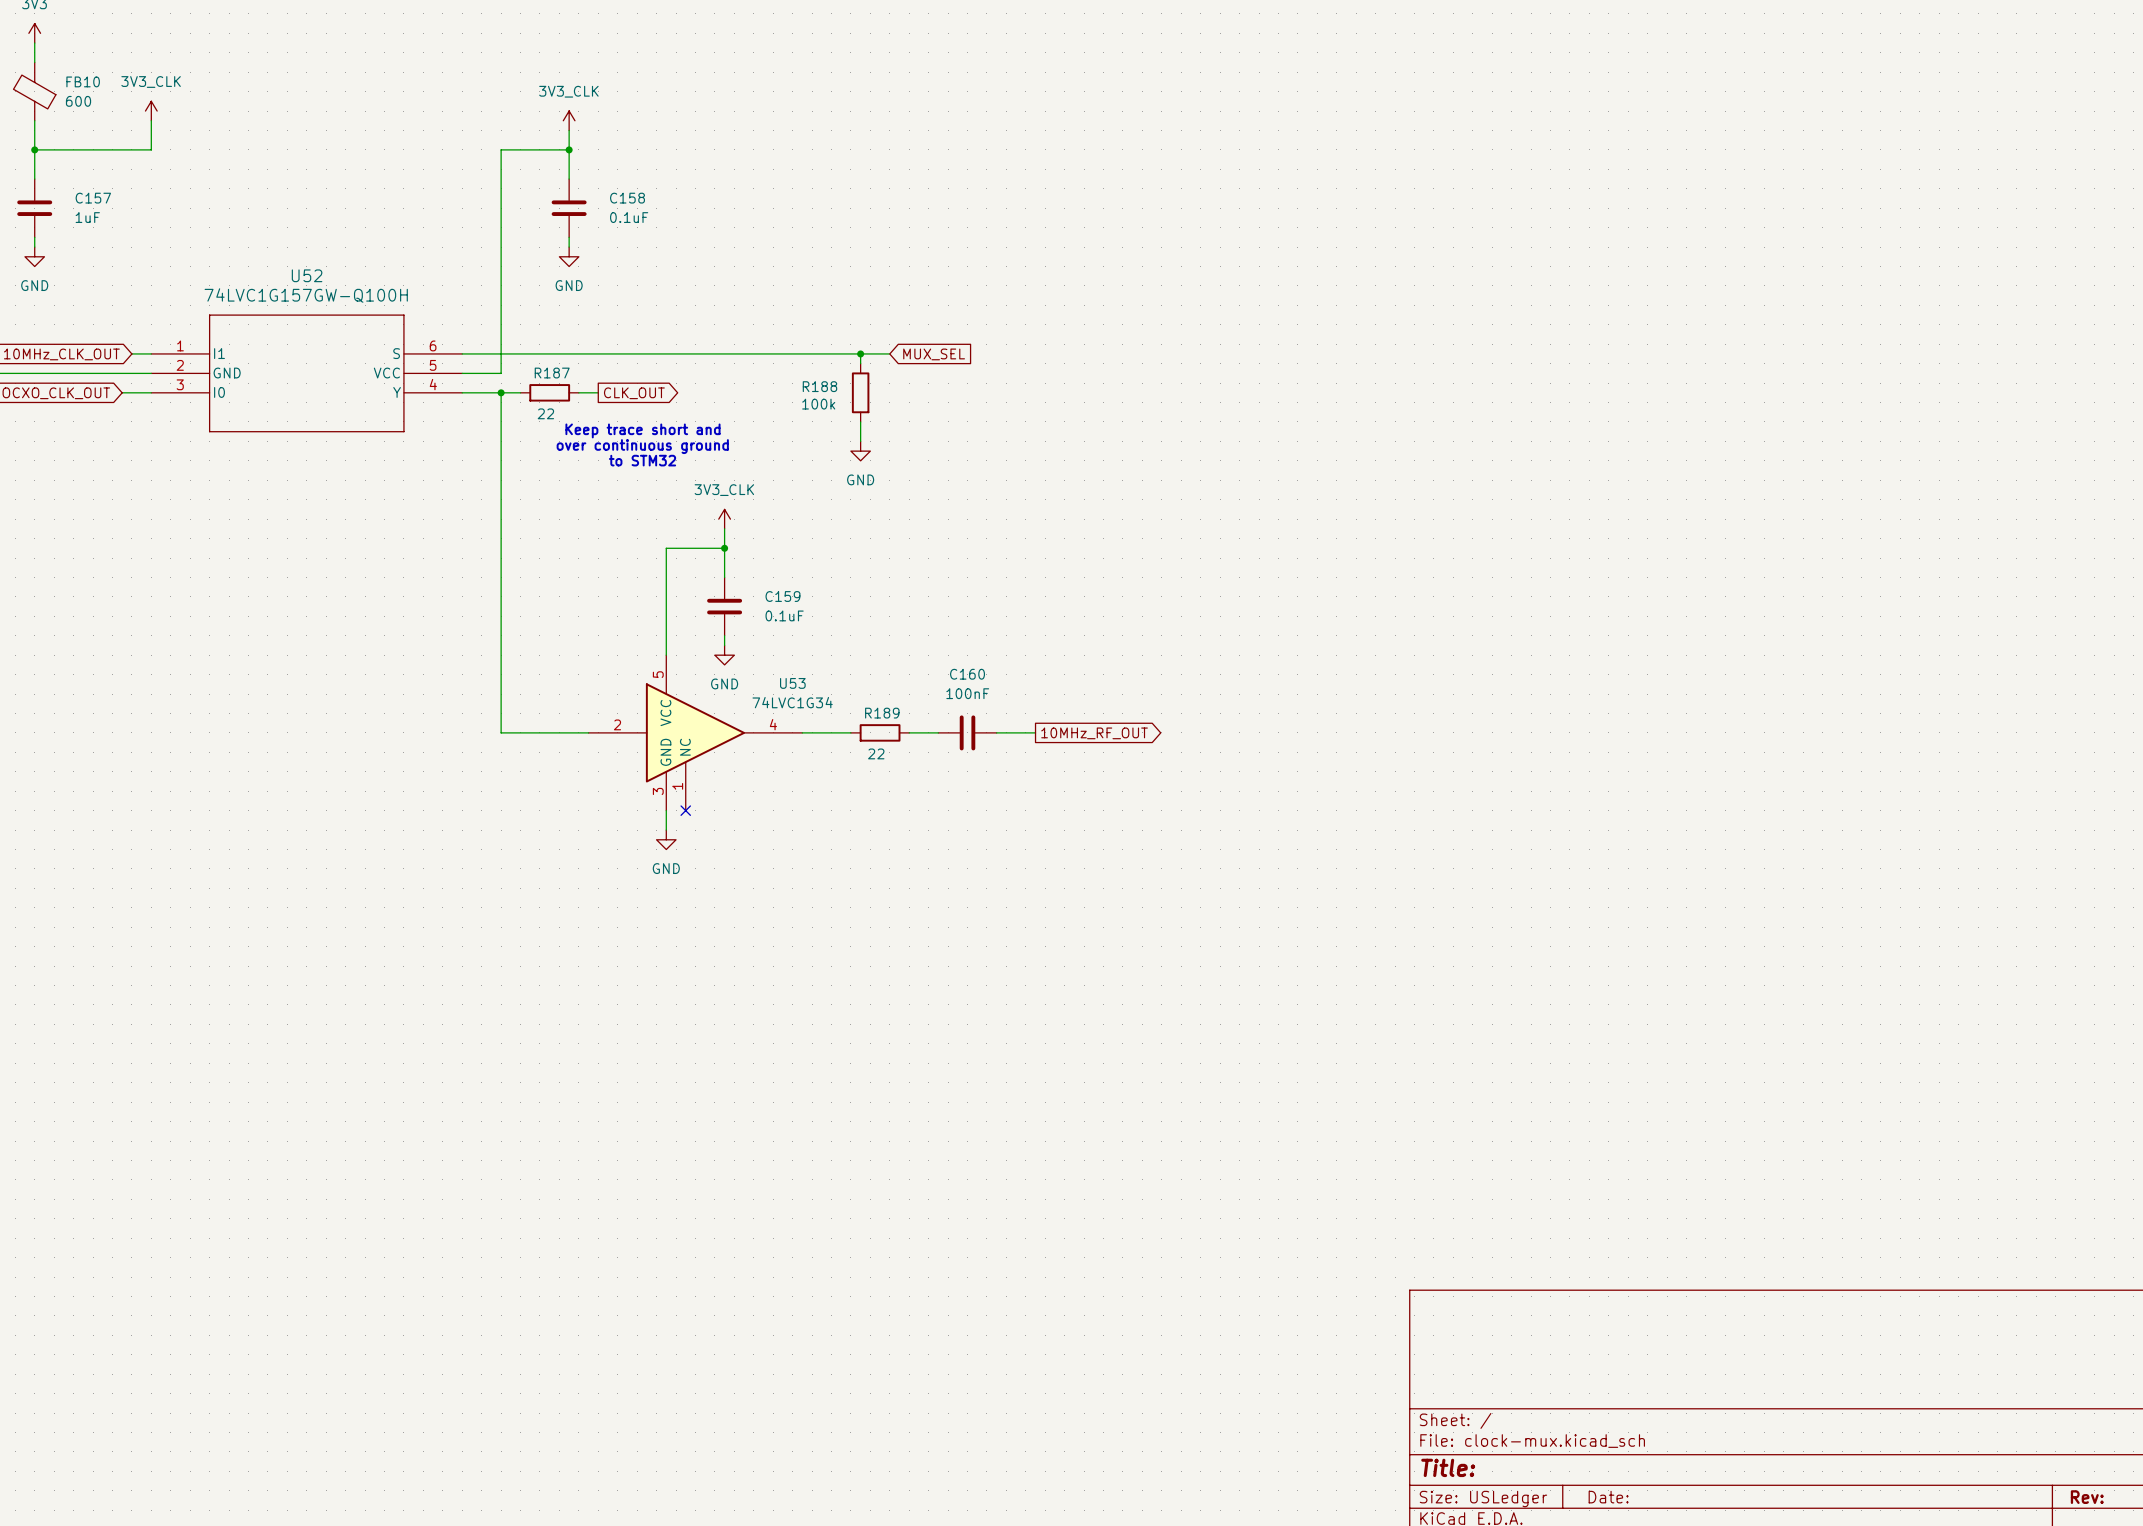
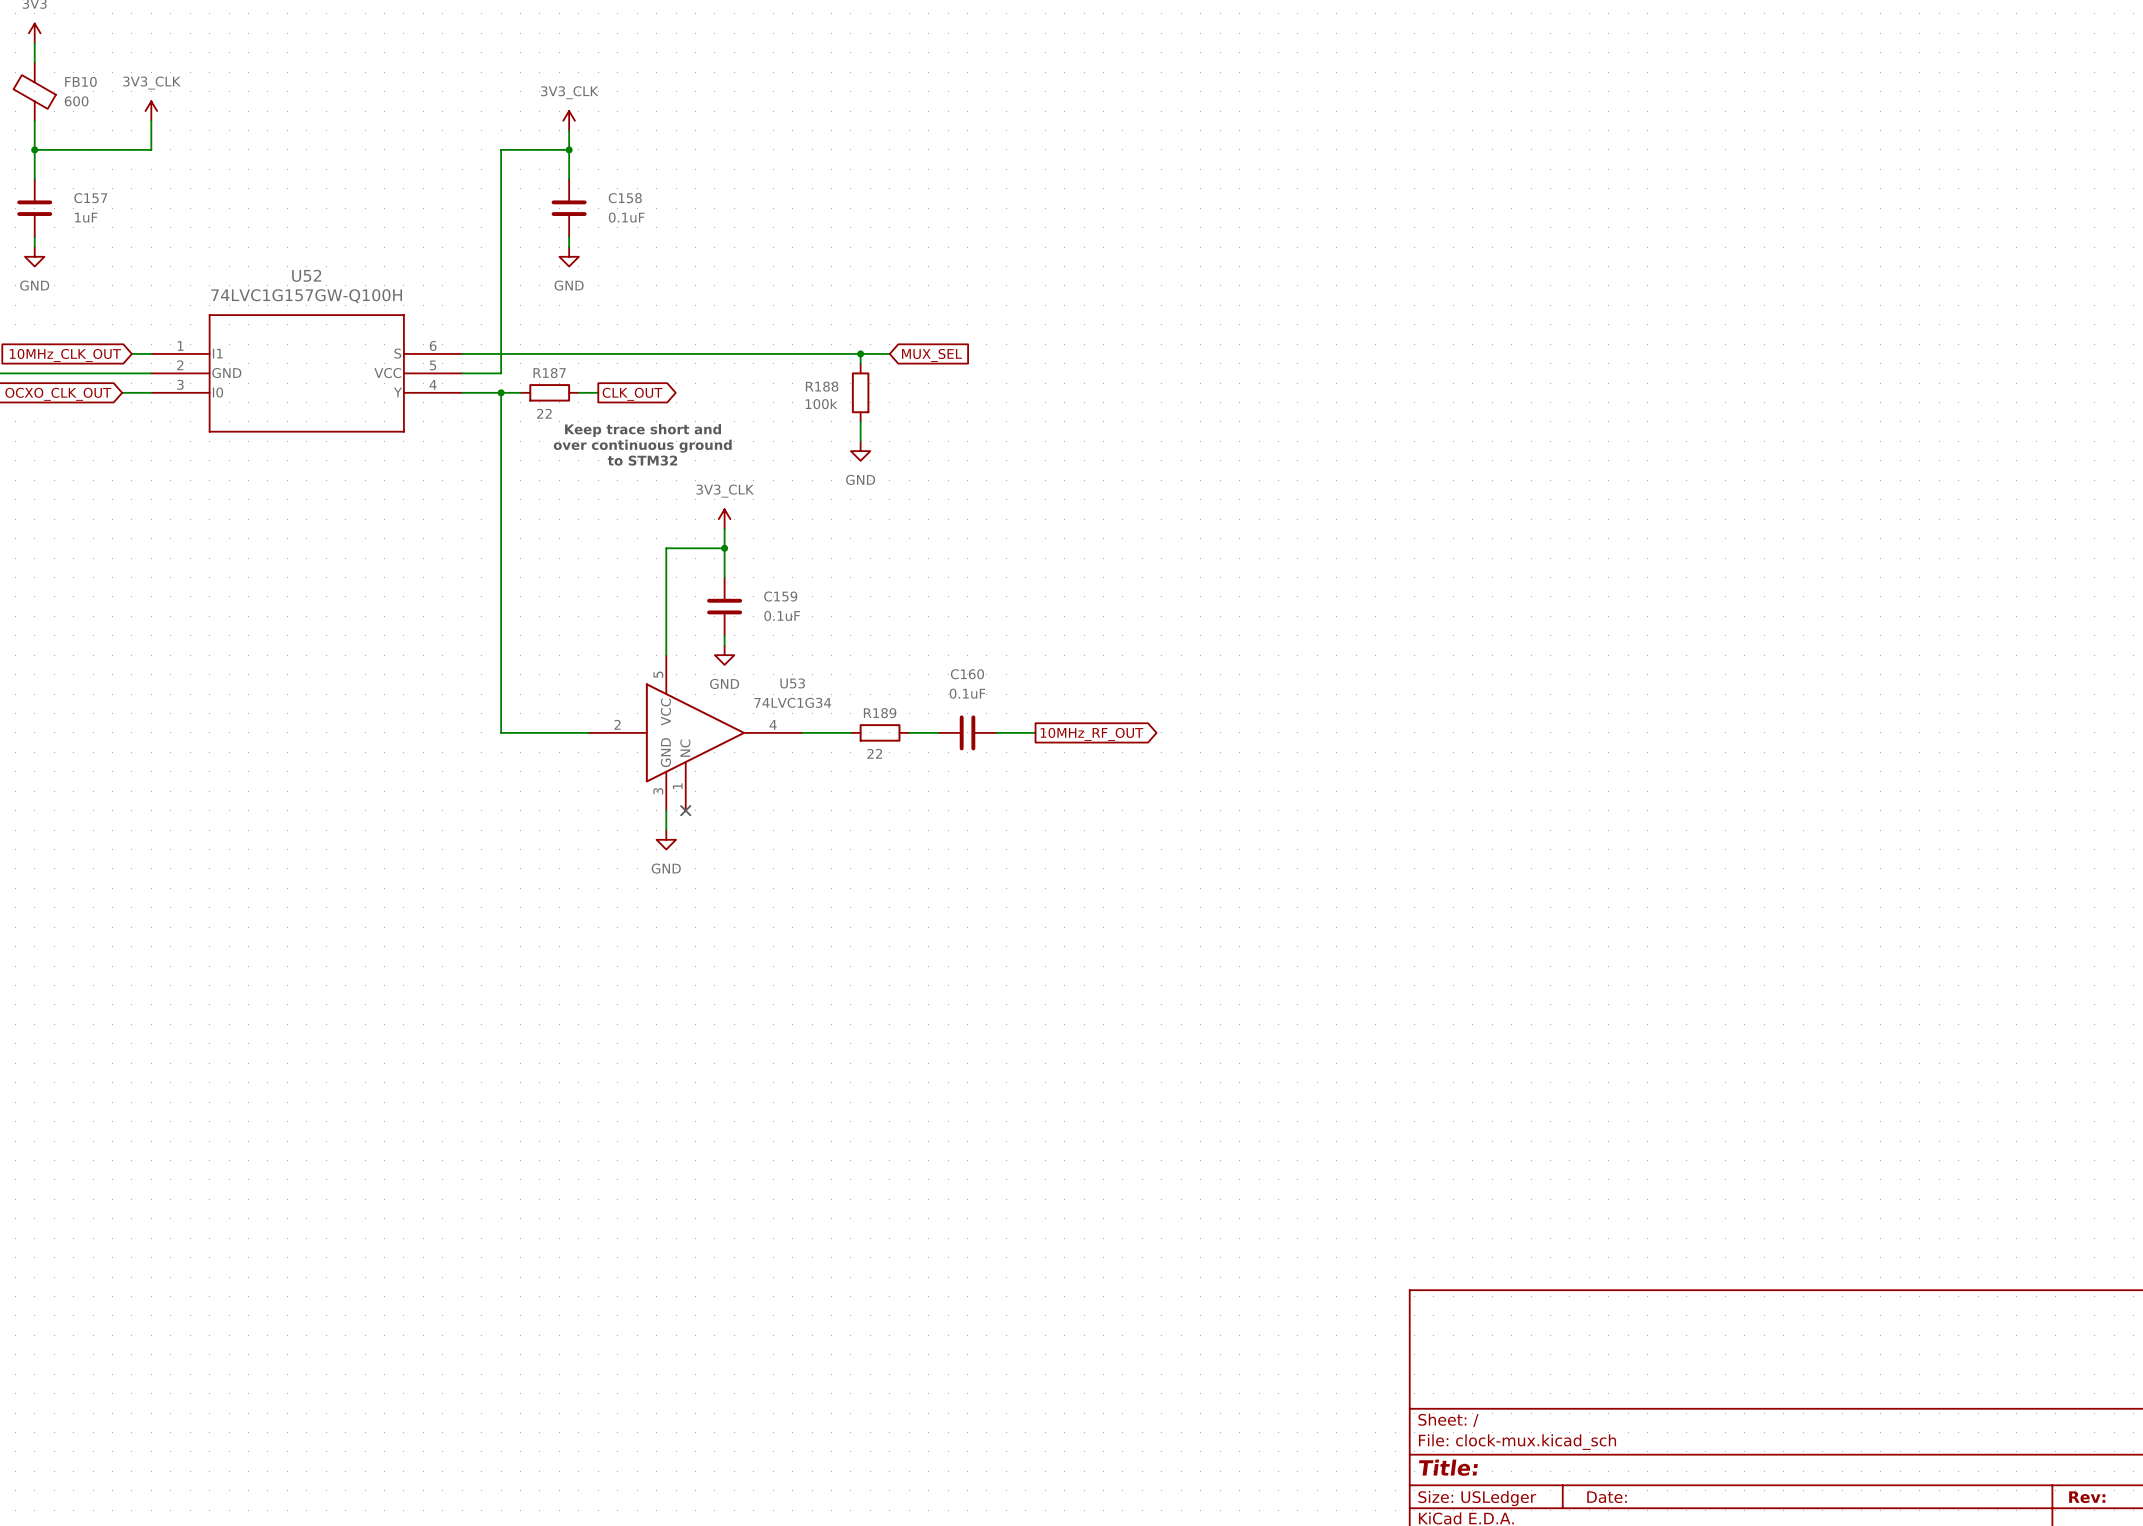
C160 value: 100nF (967, 693) -> 0.1uF (967, 693)

